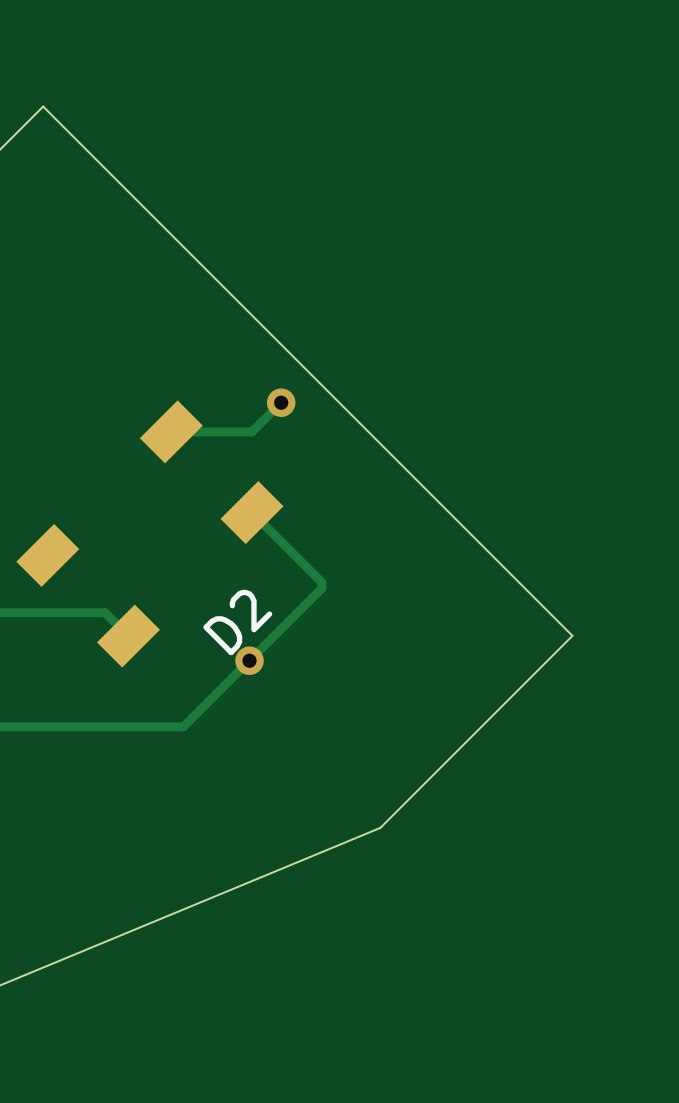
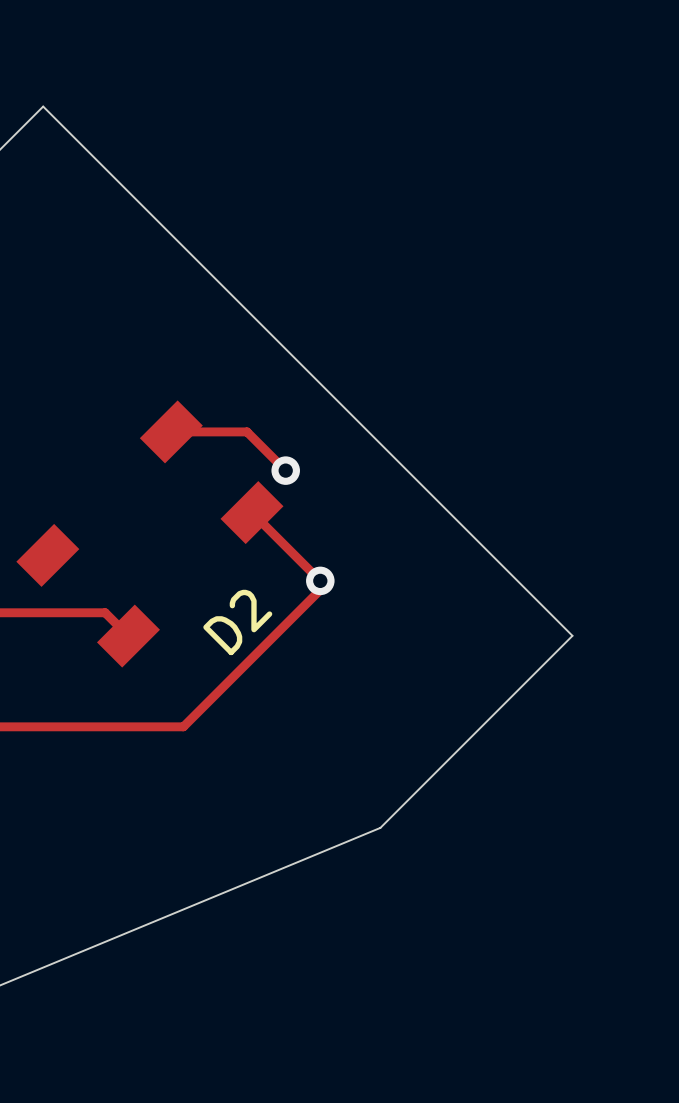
track: (281, 402) (251, 431) (247, 431) -> (285, 470) (247, 431)
via position: (281, 402) -> (285, 470)
via: none -> (320, 580)
via: (249, 660) -> none

